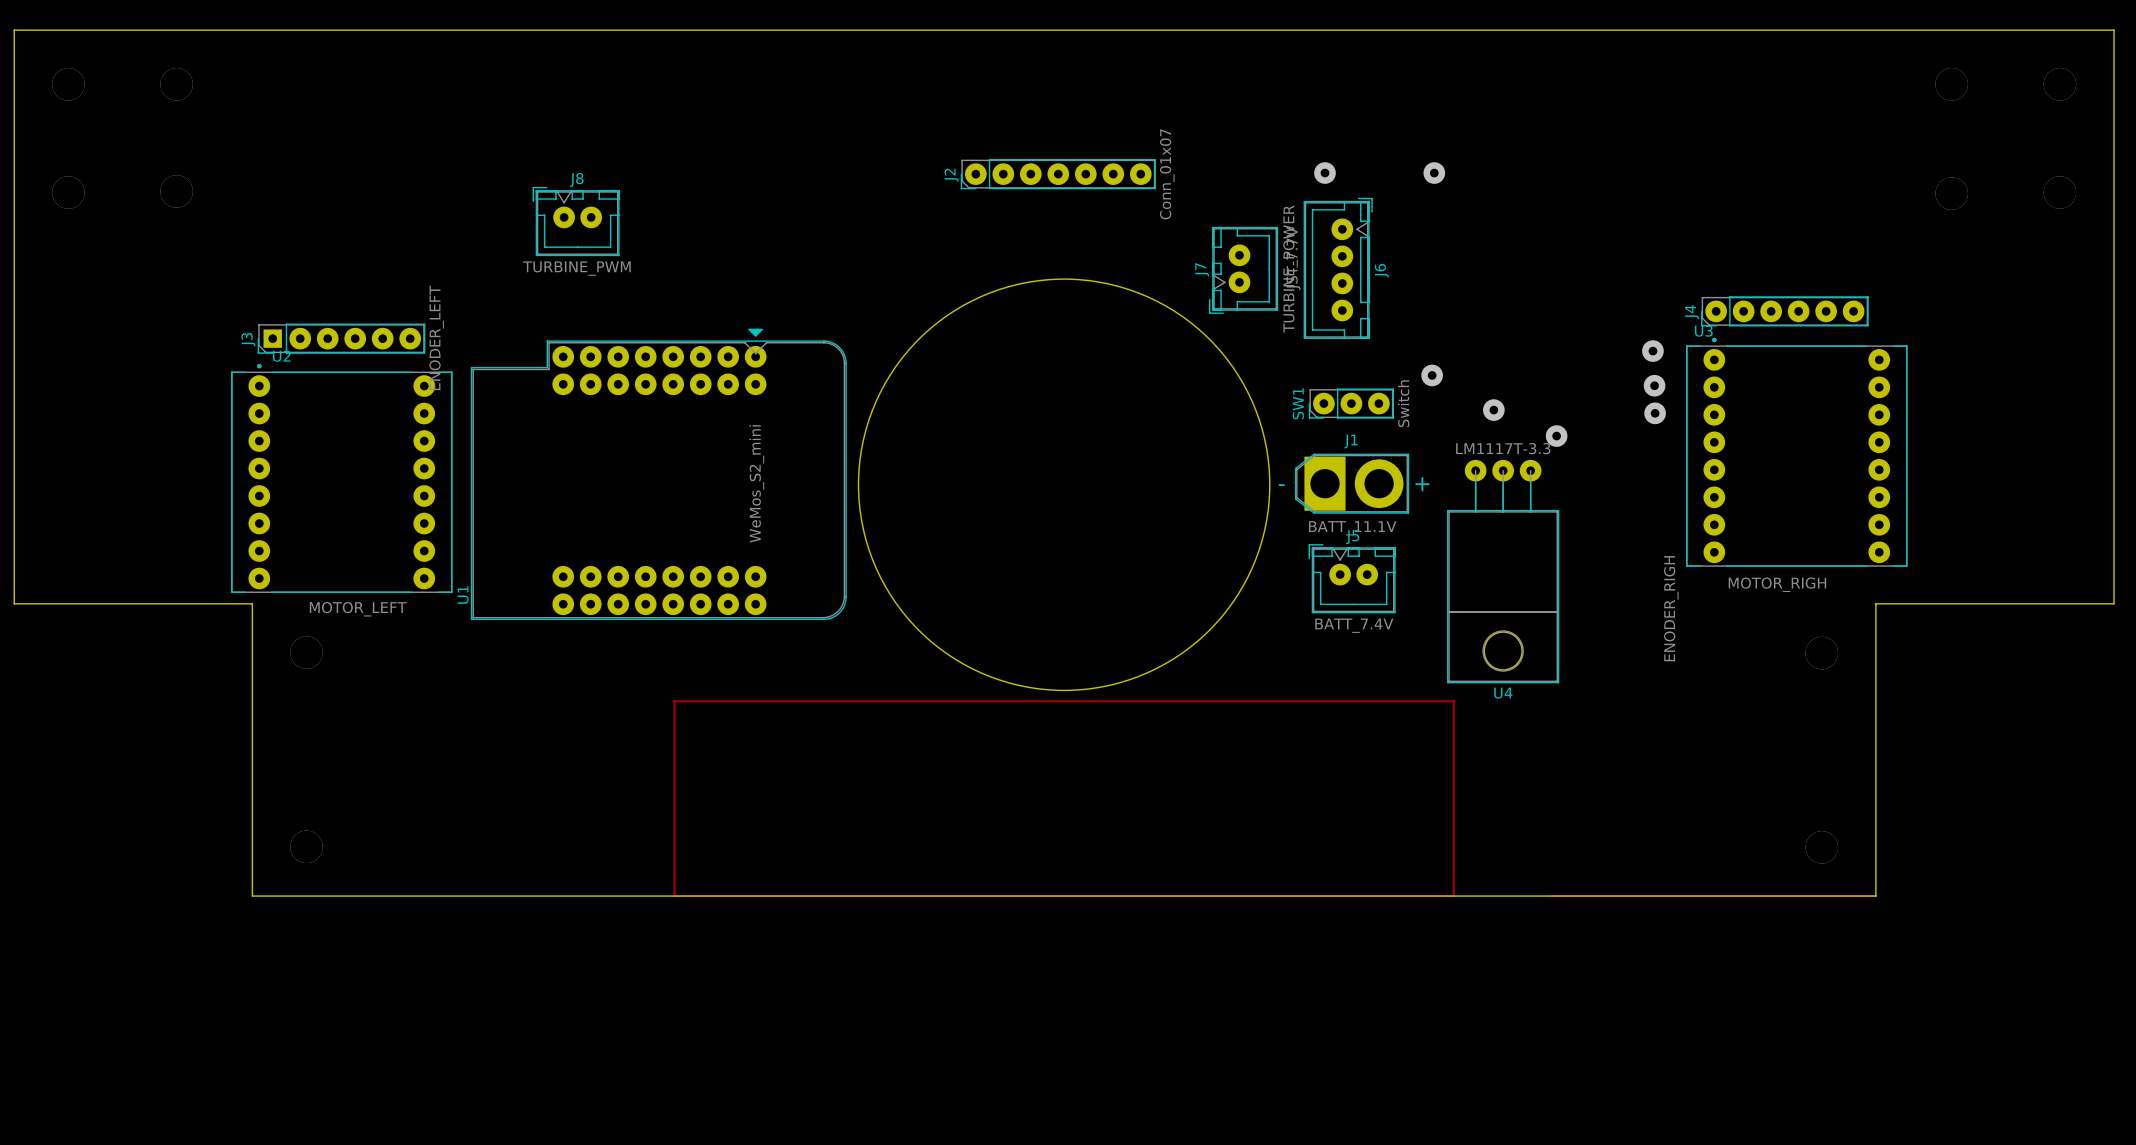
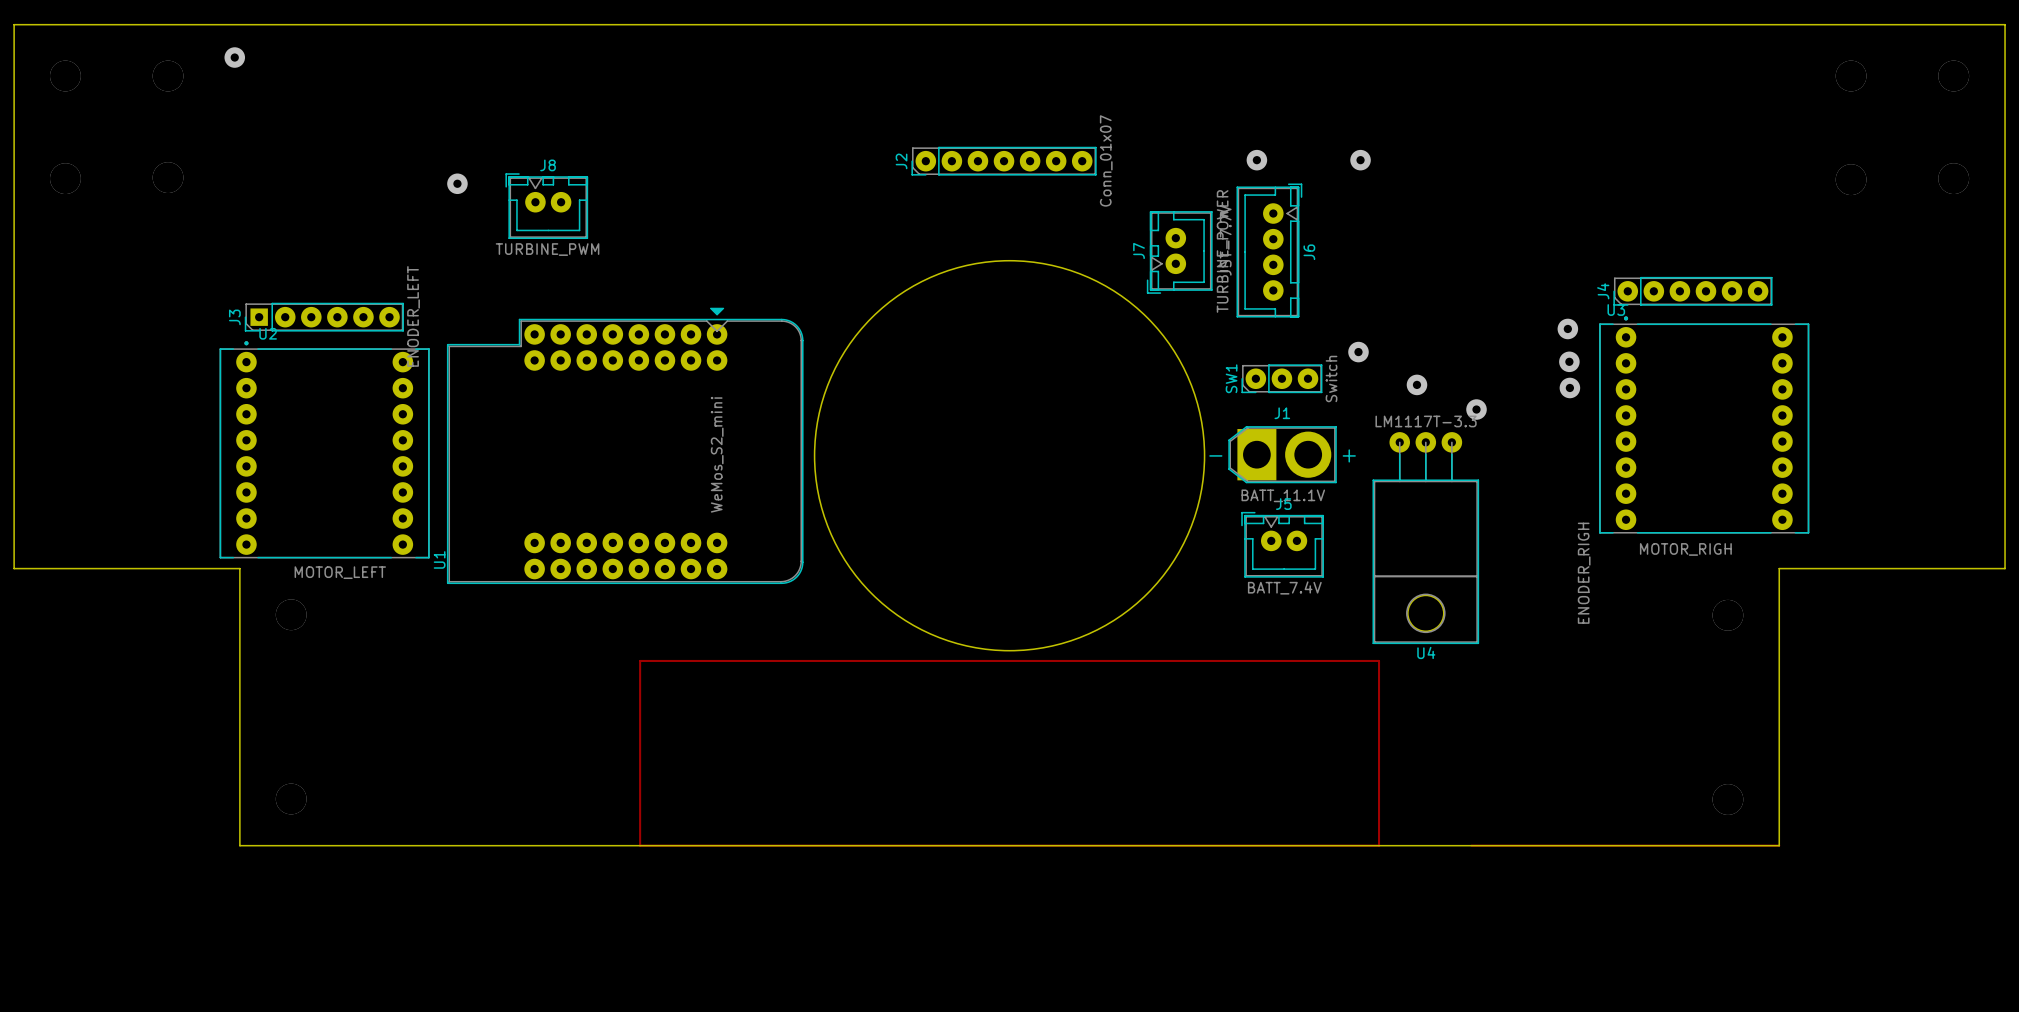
via: none -> (234, 57)
via: none -> (457, 183)

